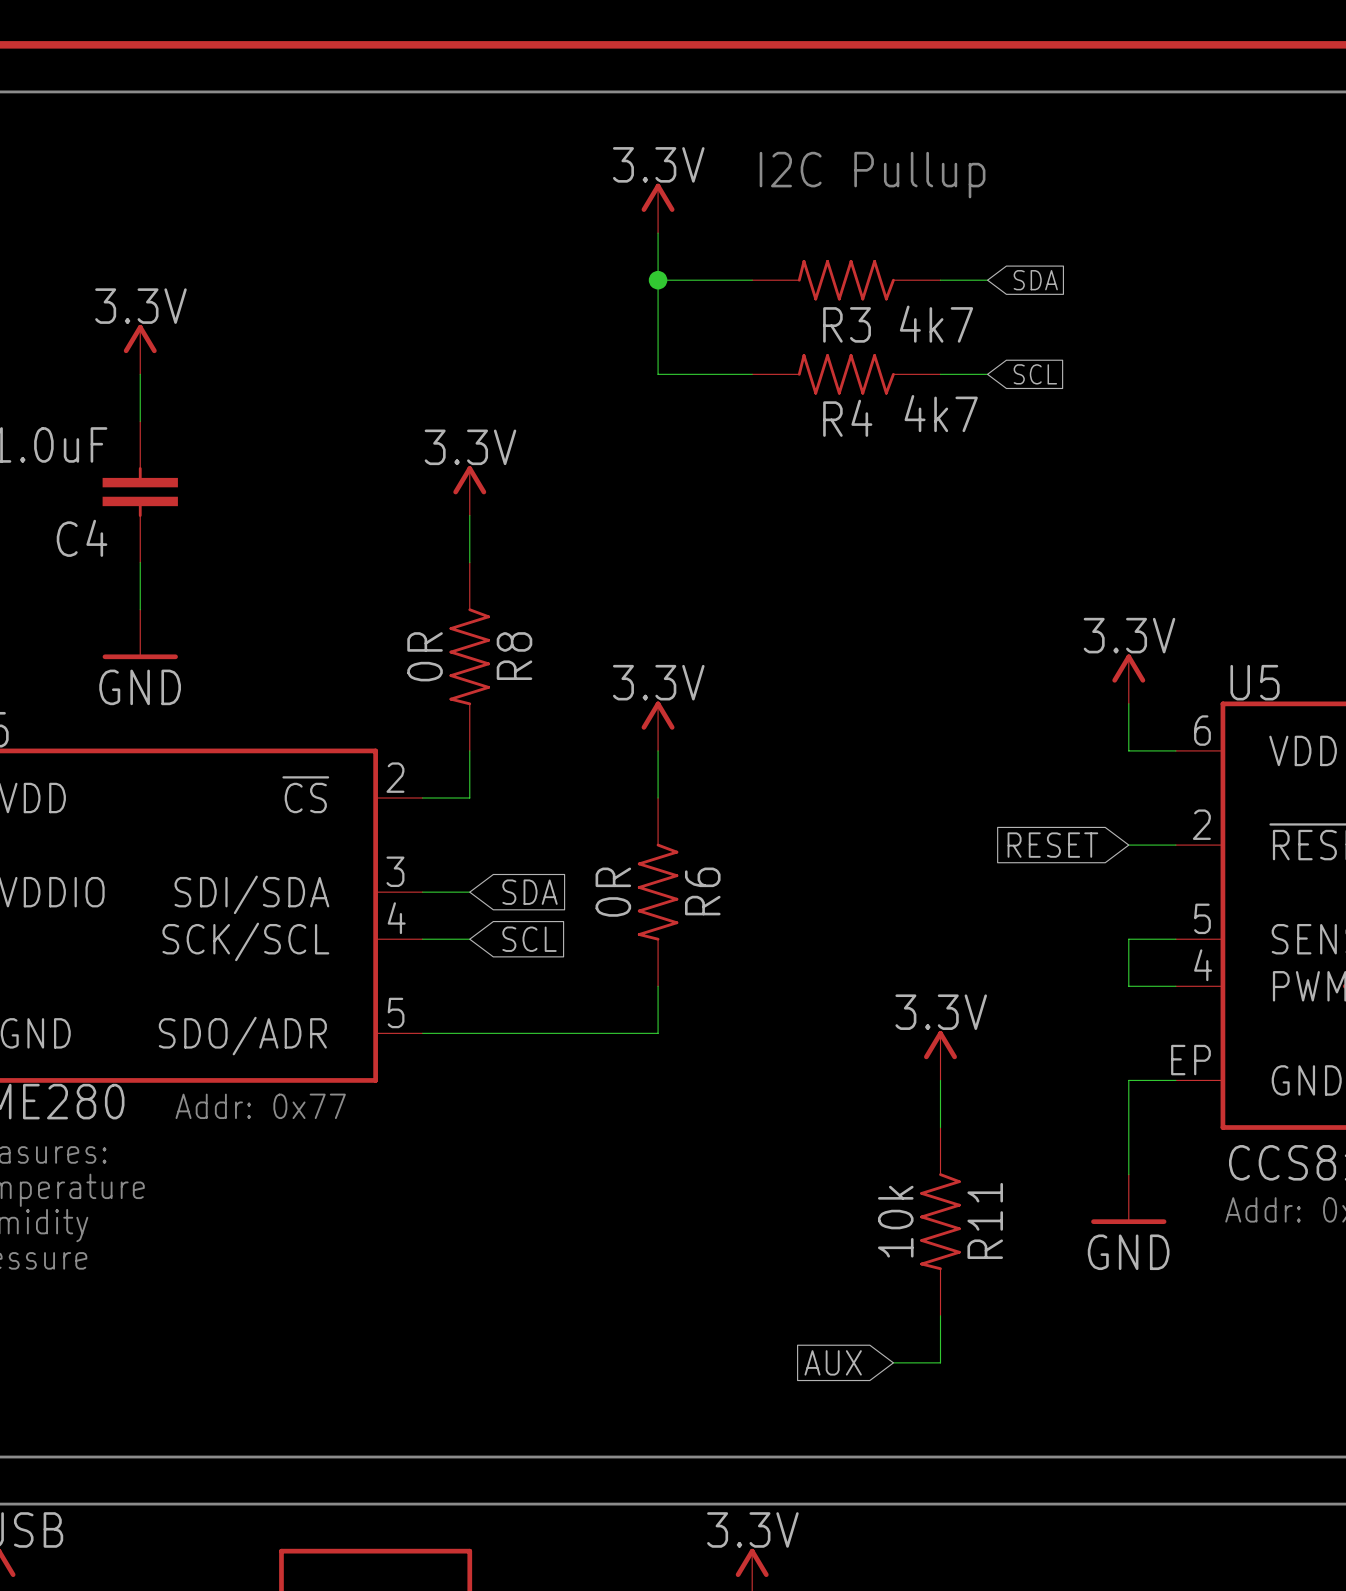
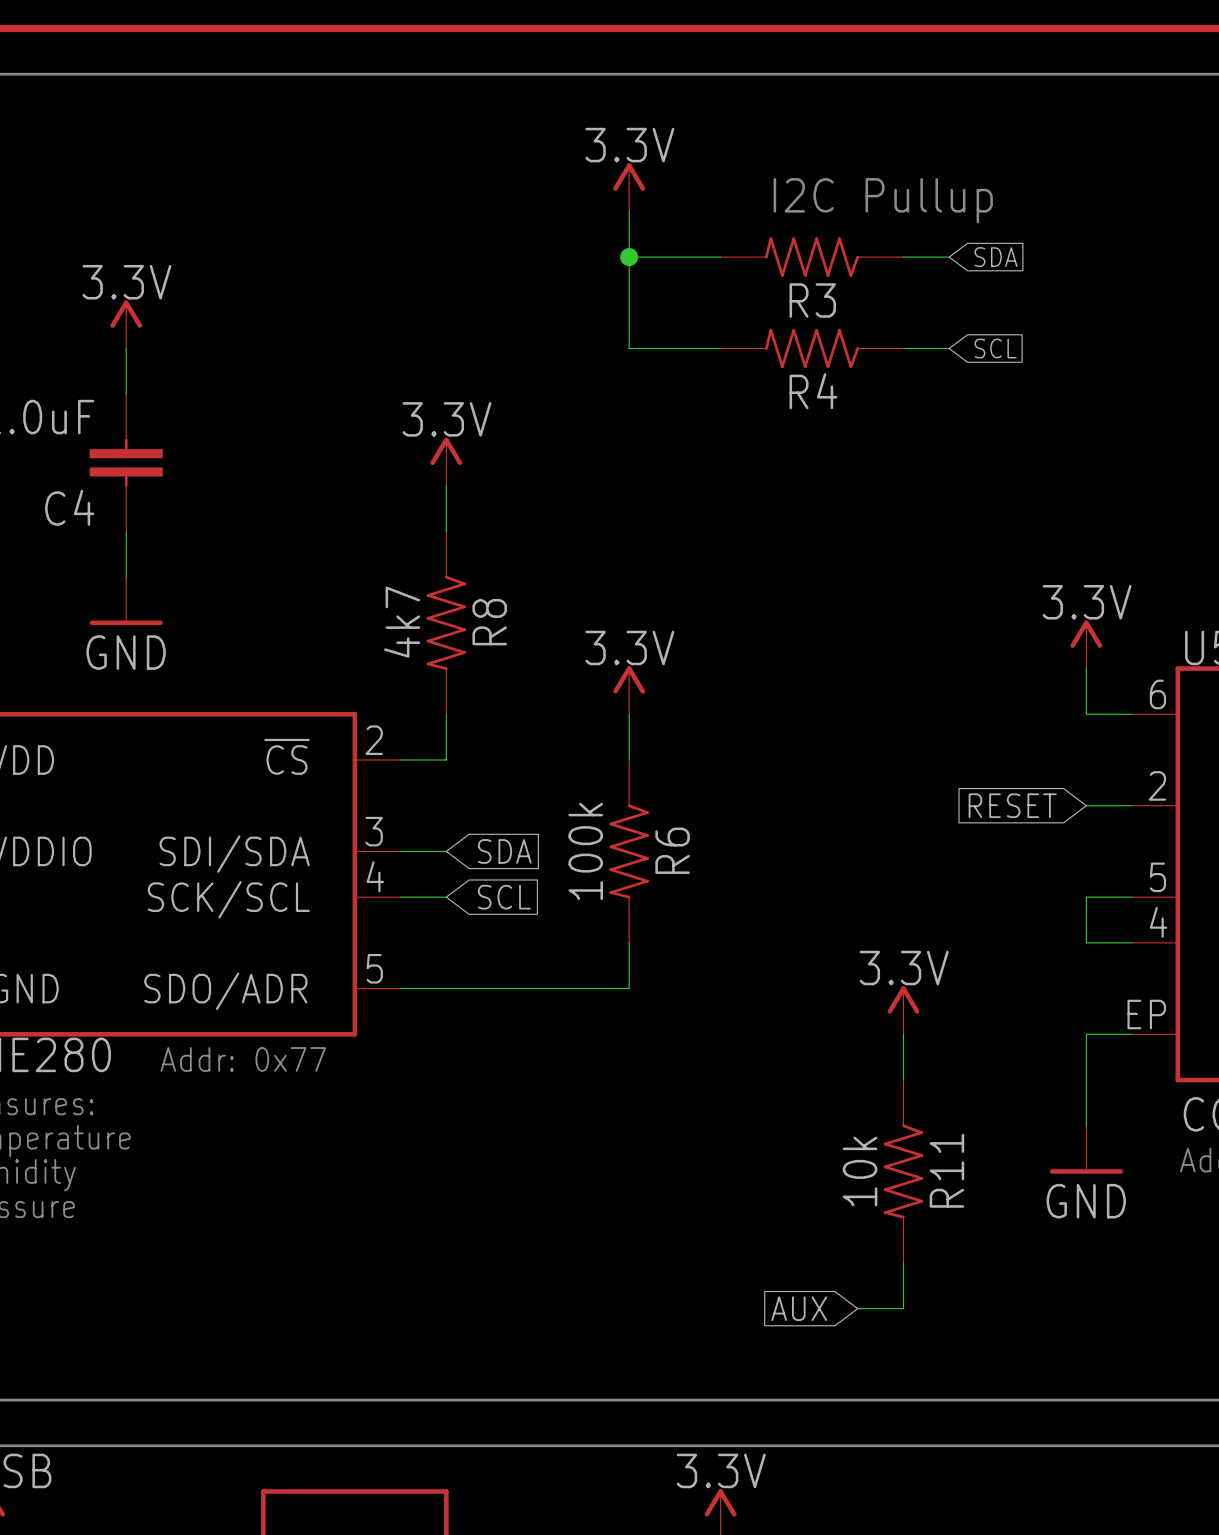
text position: I2C Pullup (872, 175) -> I2C Pullup (883, 200)
R3 value: 4k7 (936, 324) -> none
R4 value: 4k7 (941, 413) -> none
R8 value: 0R (425, 656) -> 4k7 (402, 622)
R6 value: 0R (613, 892) -> 100k (585, 851)

